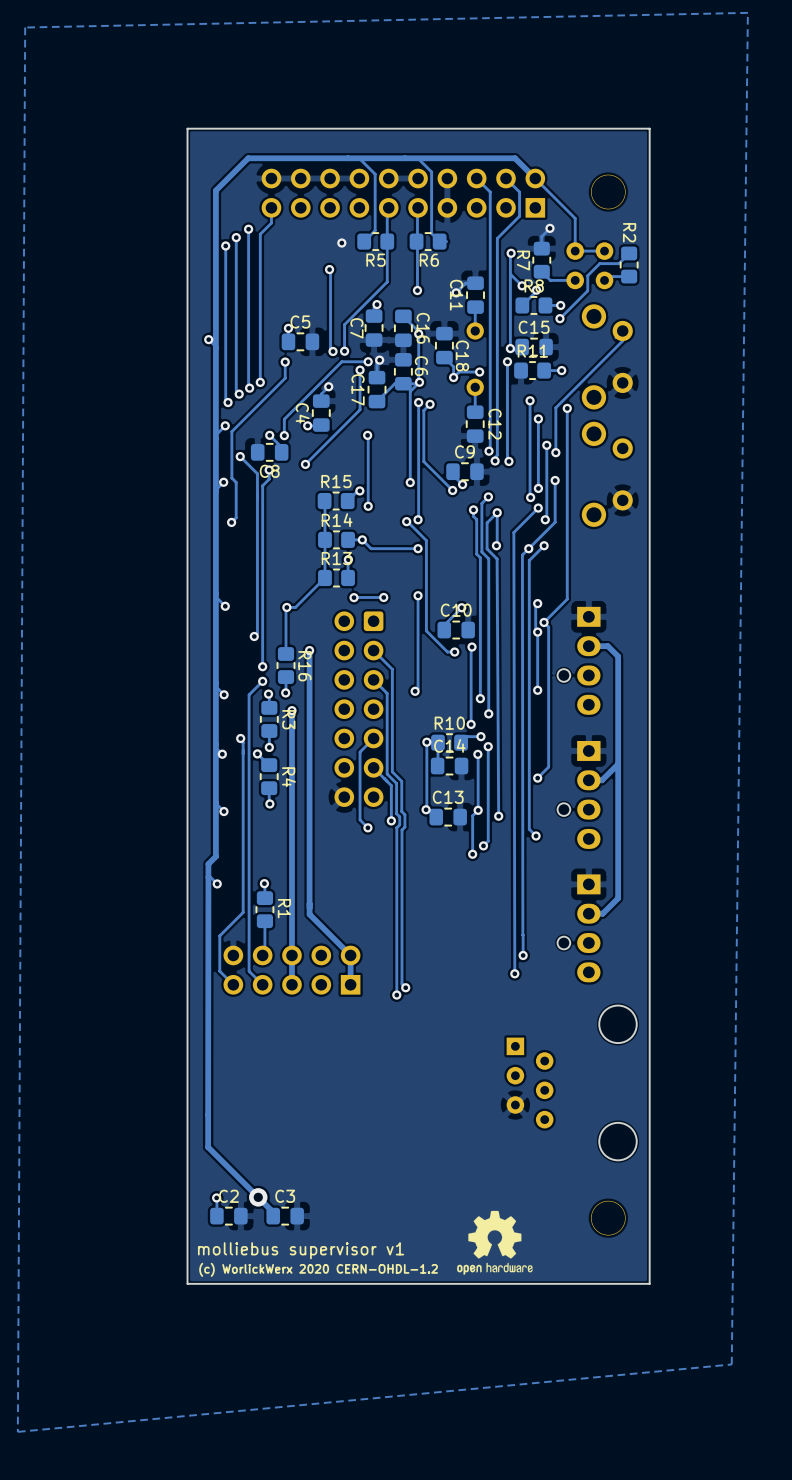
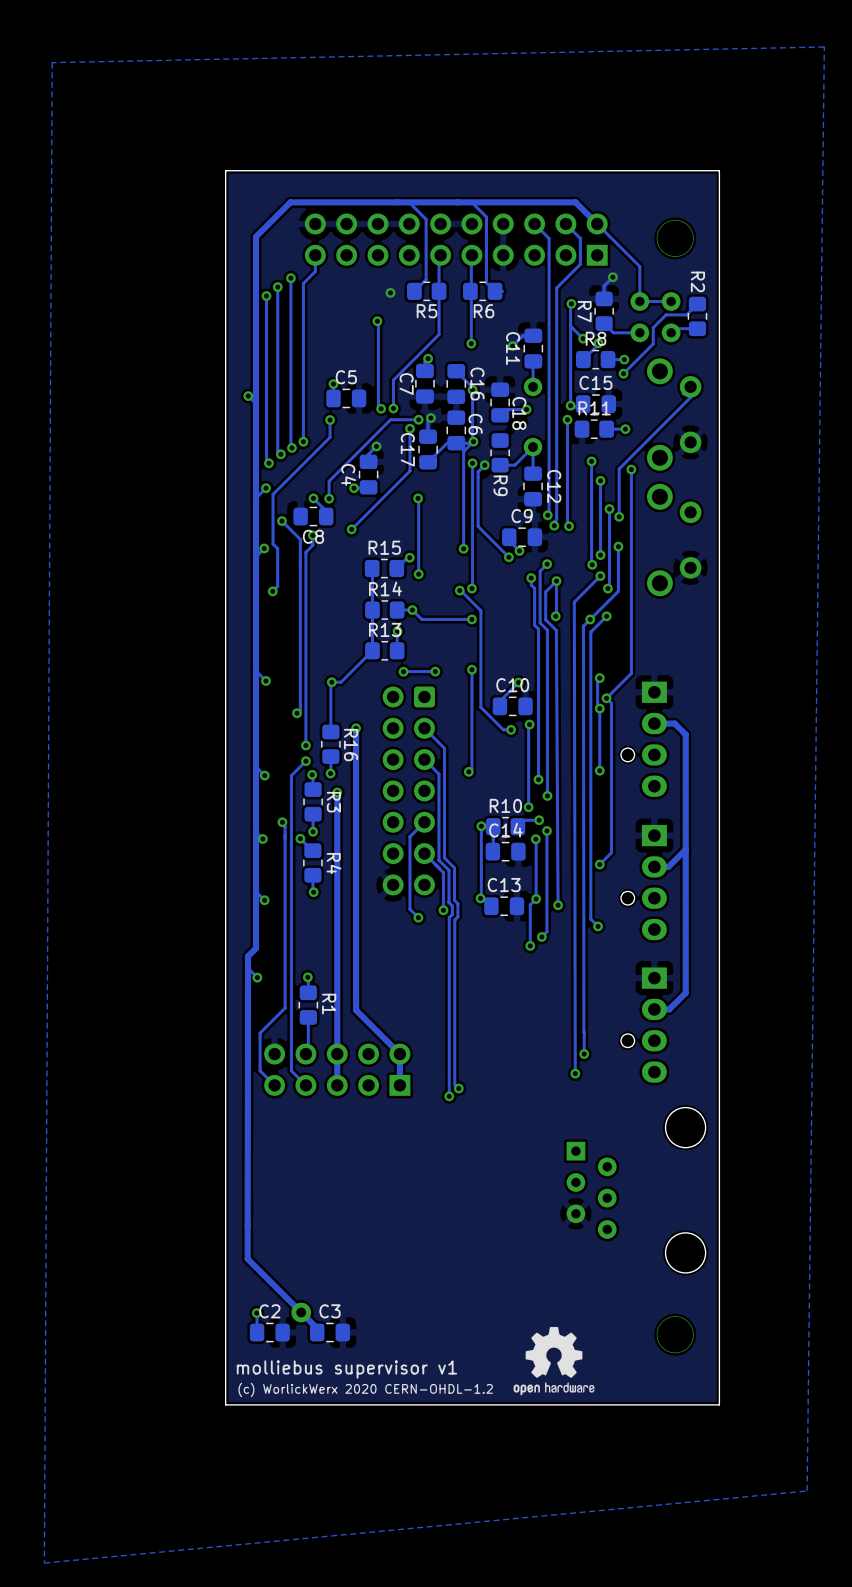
via: none -> (526, 409)
track: (444, 357) (453, 366) (453, 377) (459, 372) (479, 372) -> (500, 415) (505, 409) (526, 409)
via: (479, 372) -> none
via: (453, 377) -> none
track: none -> (533, 447) (514, 465) (500, 465)
R9: none -> (500, 452)

